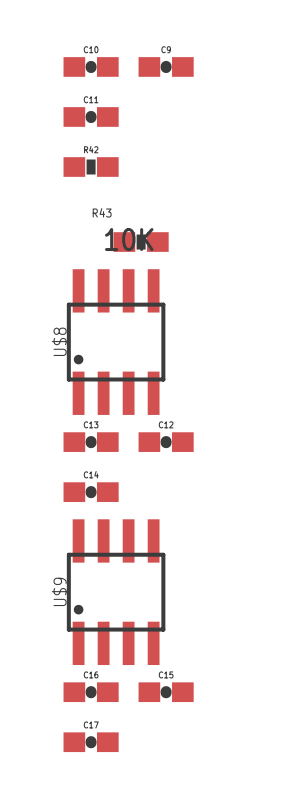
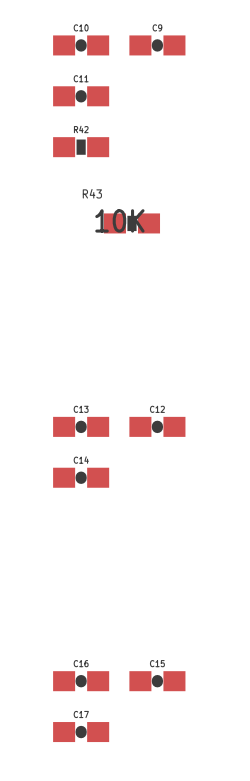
U$8: (116, 342) -> none
U$9: (116, 592) -> none

